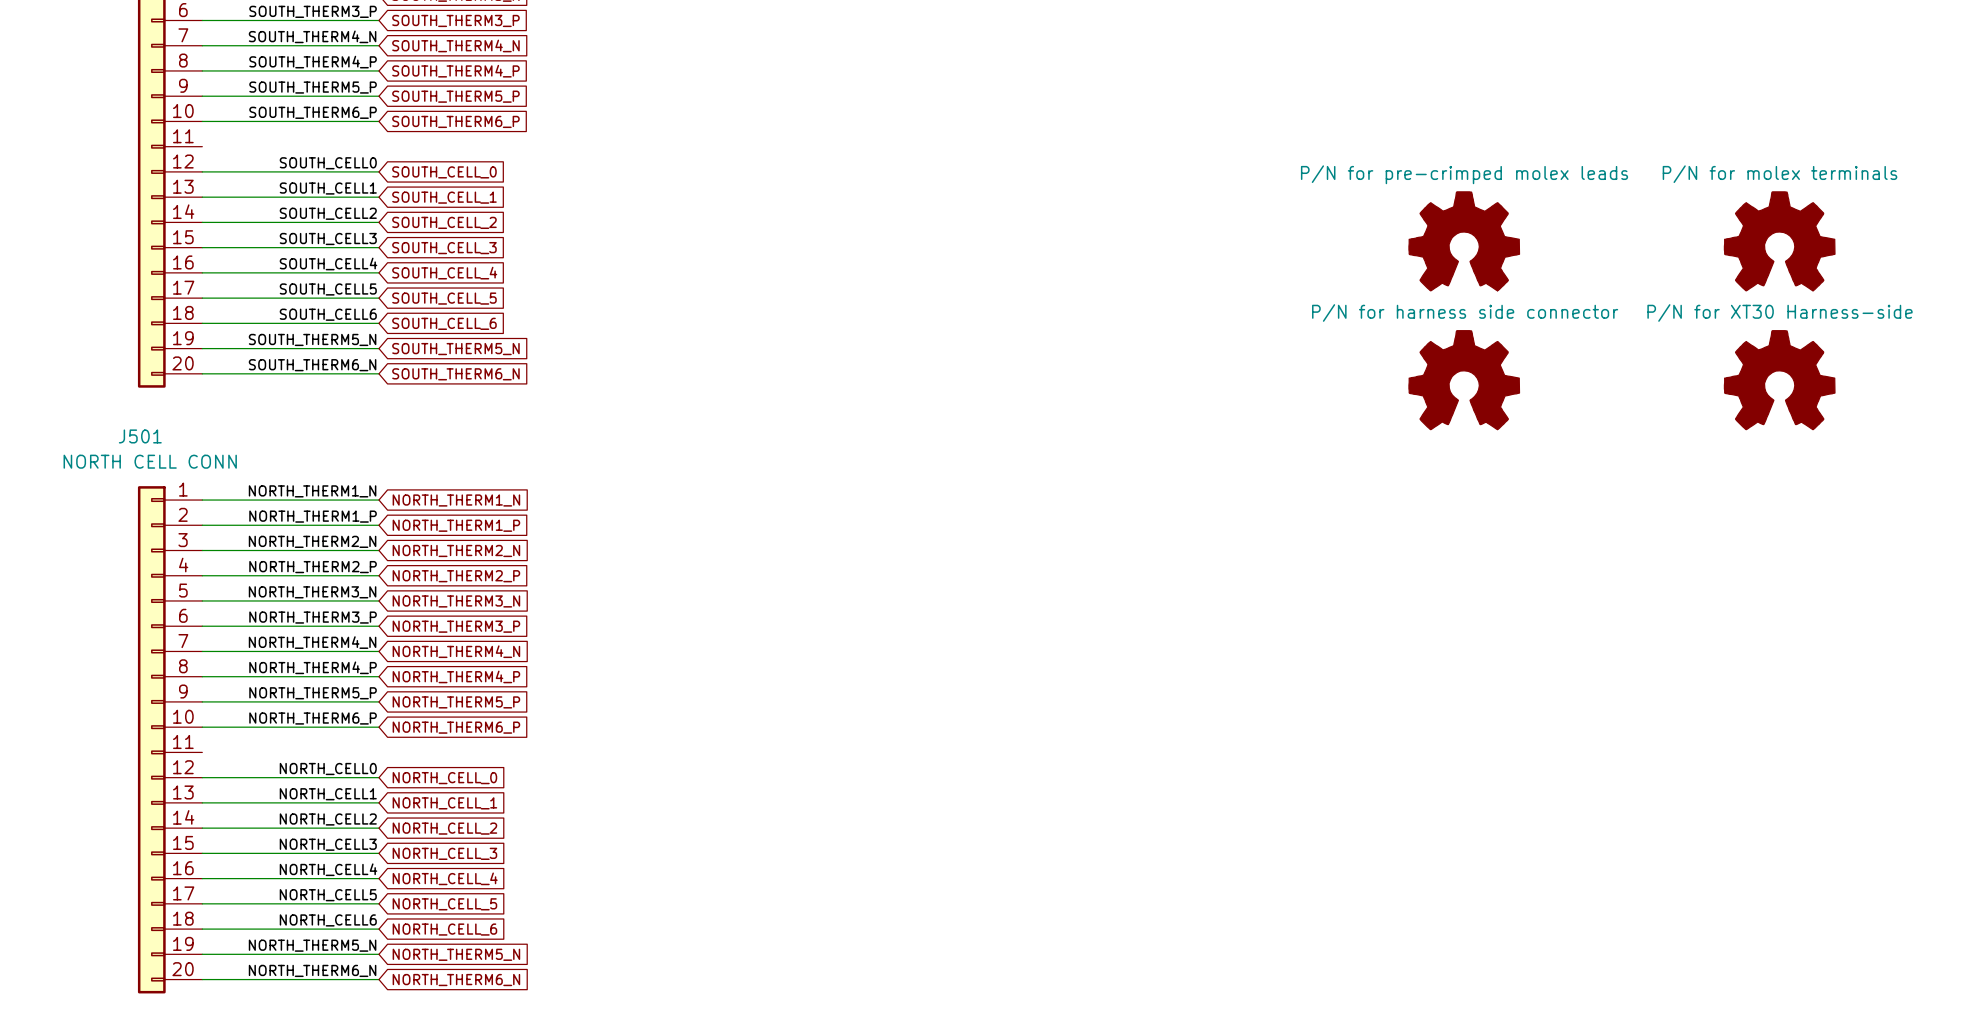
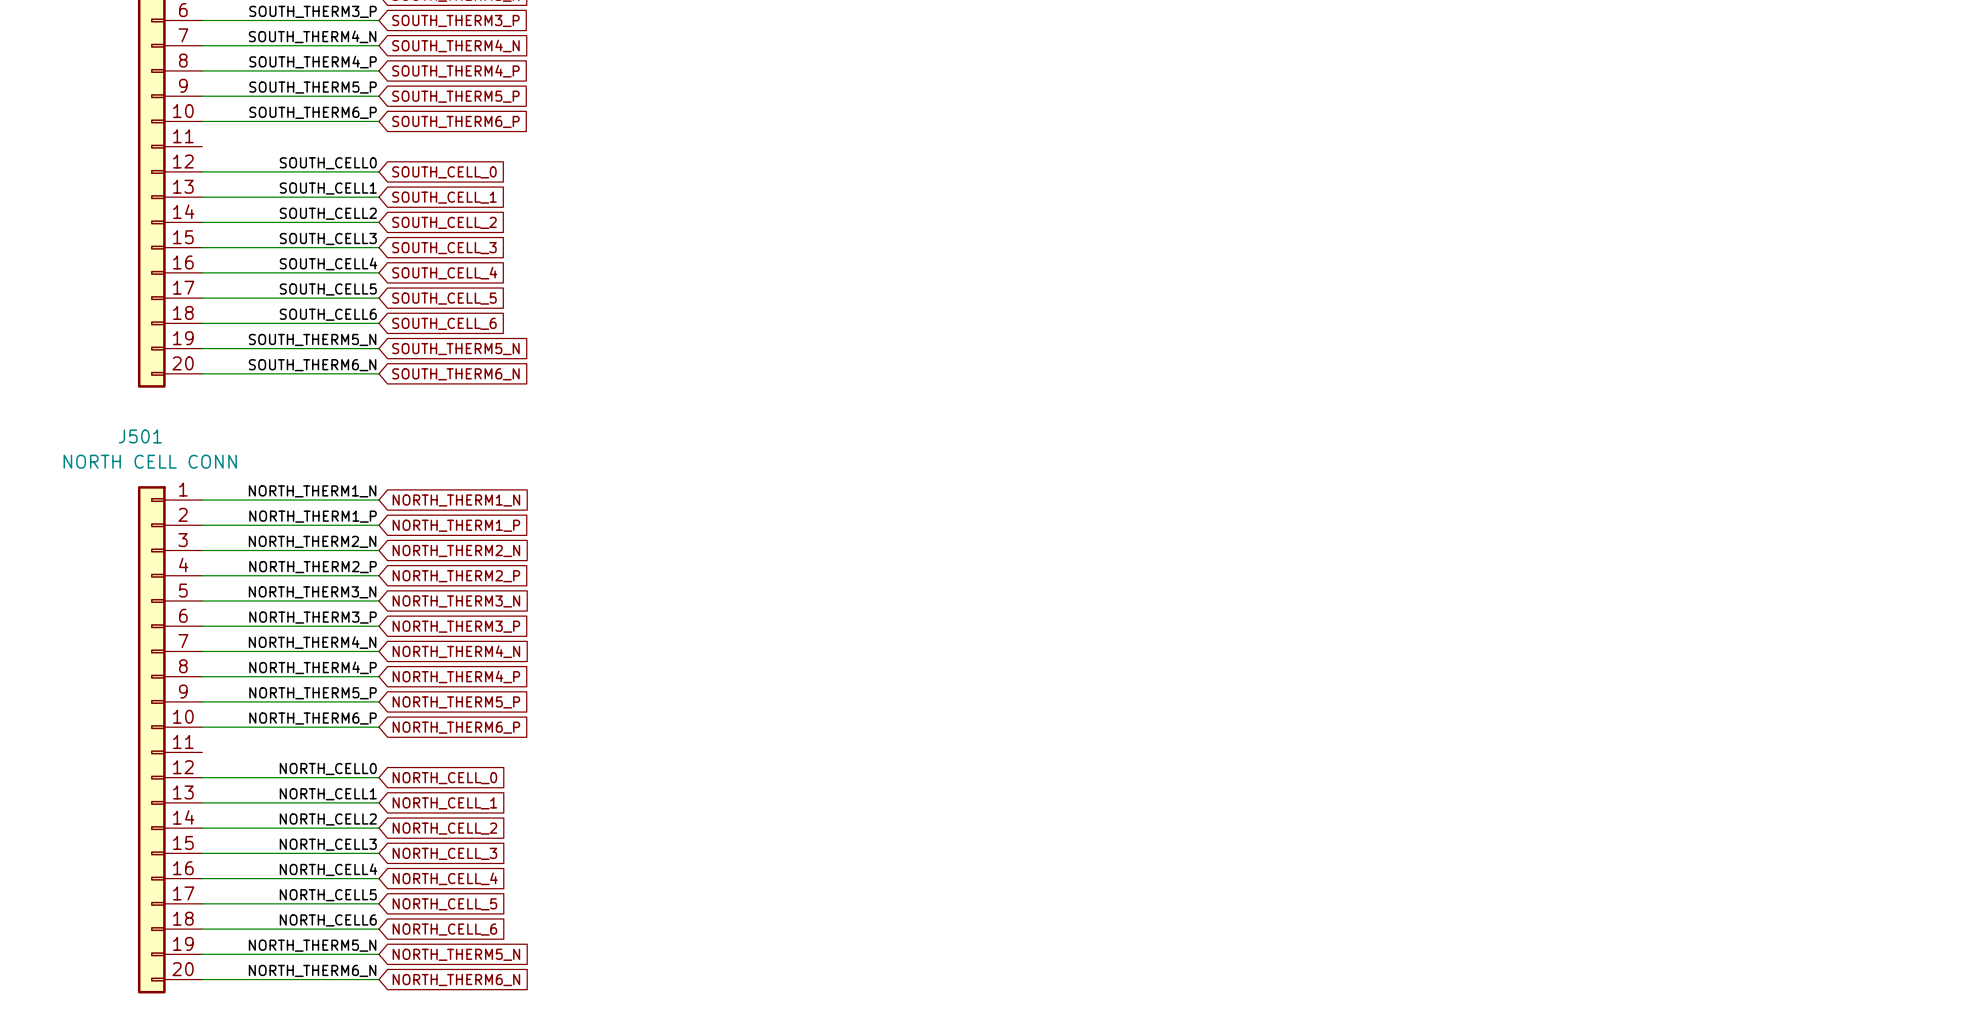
power symbol: (1464, 241) -> none
power symbol: (1779, 241) -> none
power symbol: (1464, 380) -> none
power symbol: (1779, 380) -> none

